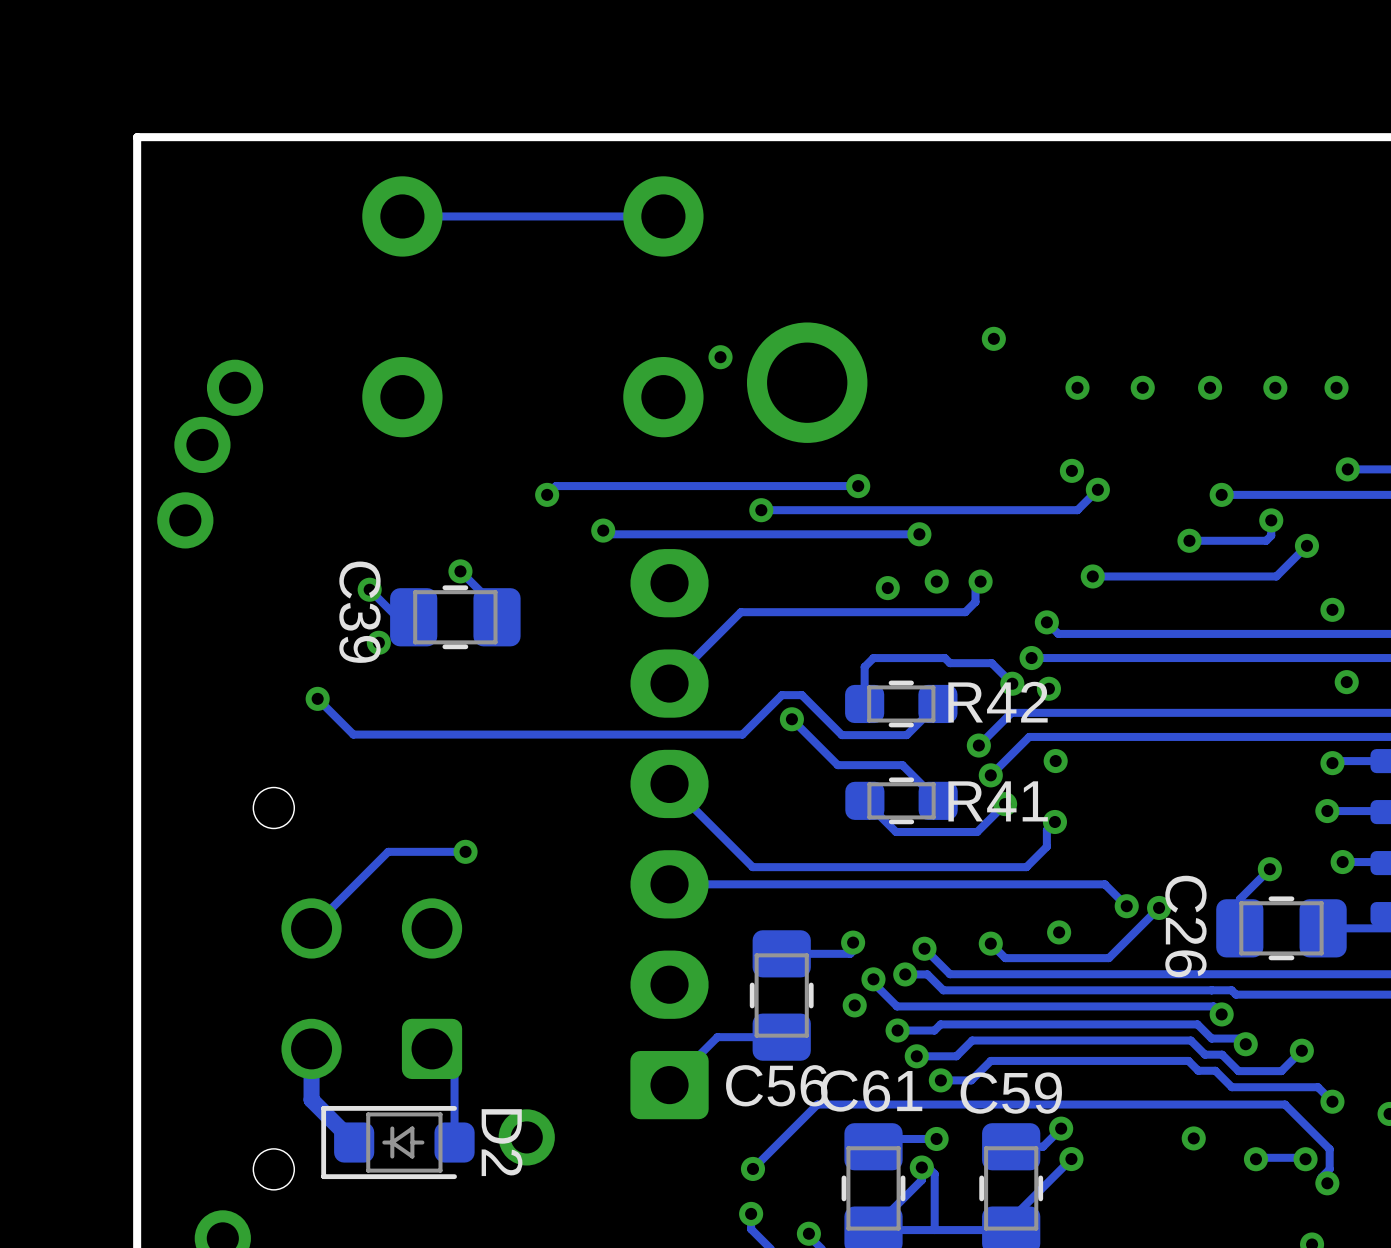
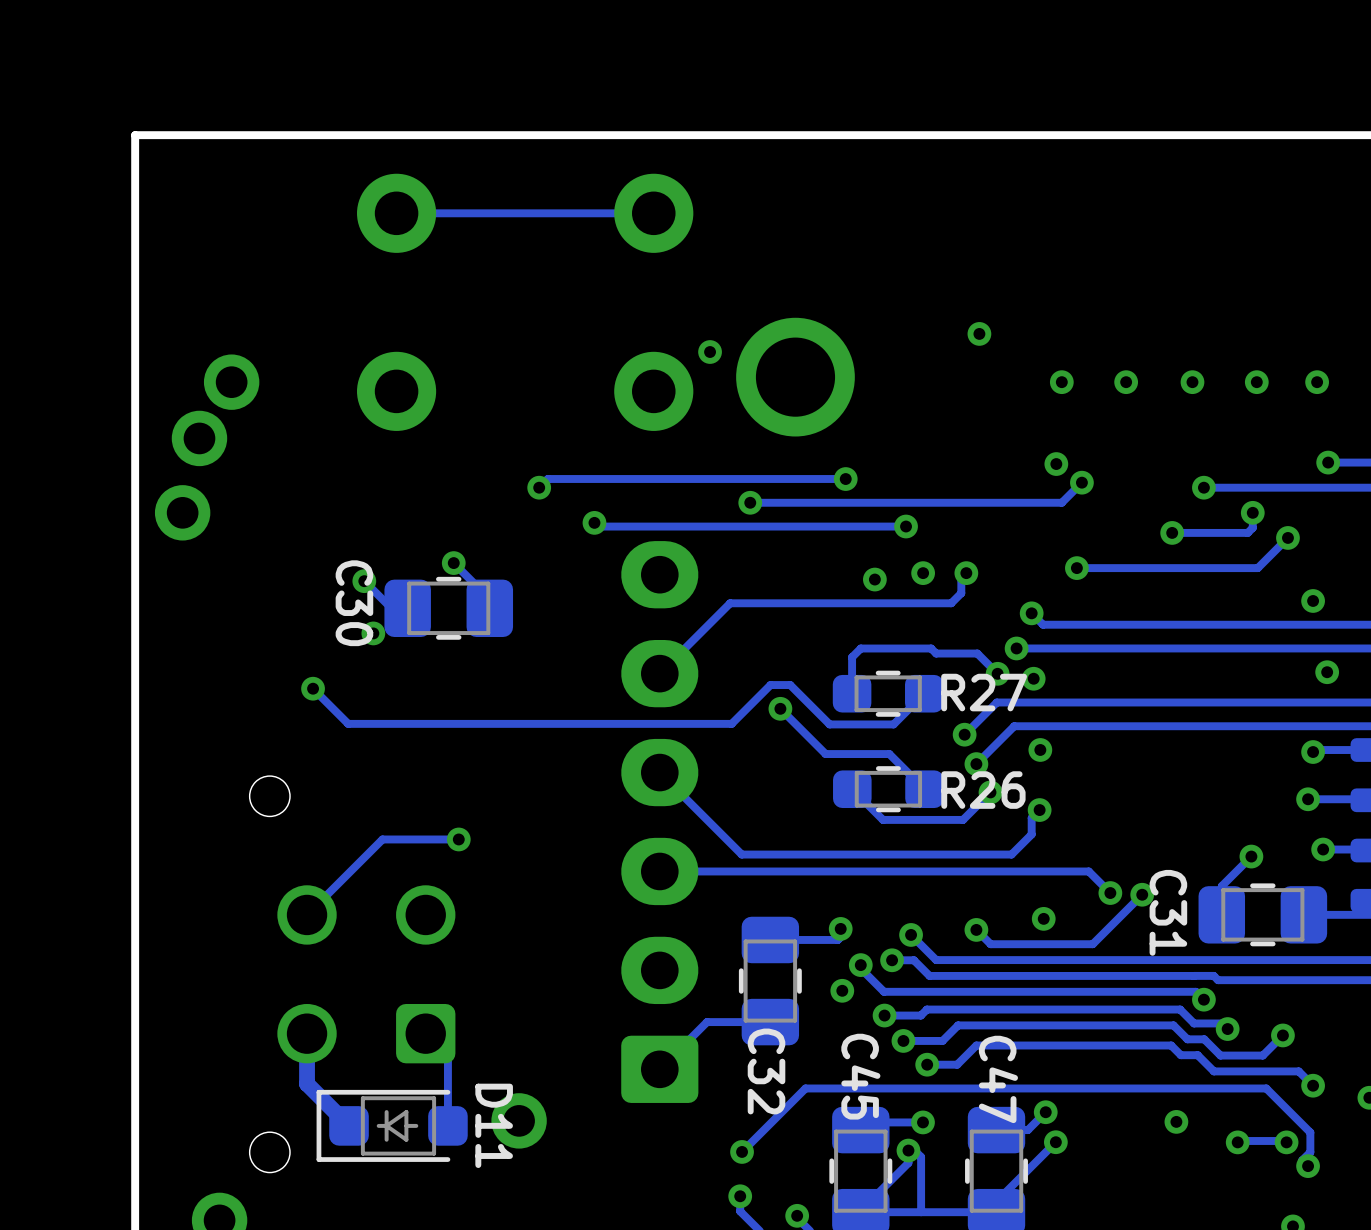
C39 name: C39 (359, 612) -> C30 (354, 603)
R42 name: R42 (998, 702) -> R27 (984, 692)
R41 name: R41 (998, 801) -> R26 (983, 790)
C26 name: C26 (1185, 926) -> C31 (1168, 912)
C56 name: C56 (776, 1085) -> C32 (766, 1071)
C61 name: C61 (871, 1091) -> C45 (860, 1076)
C59 name: C59 (1011, 1093) -> C47 (998, 1079)
D2 name: D2 (502, 1142) -> D11 (494, 1125)

